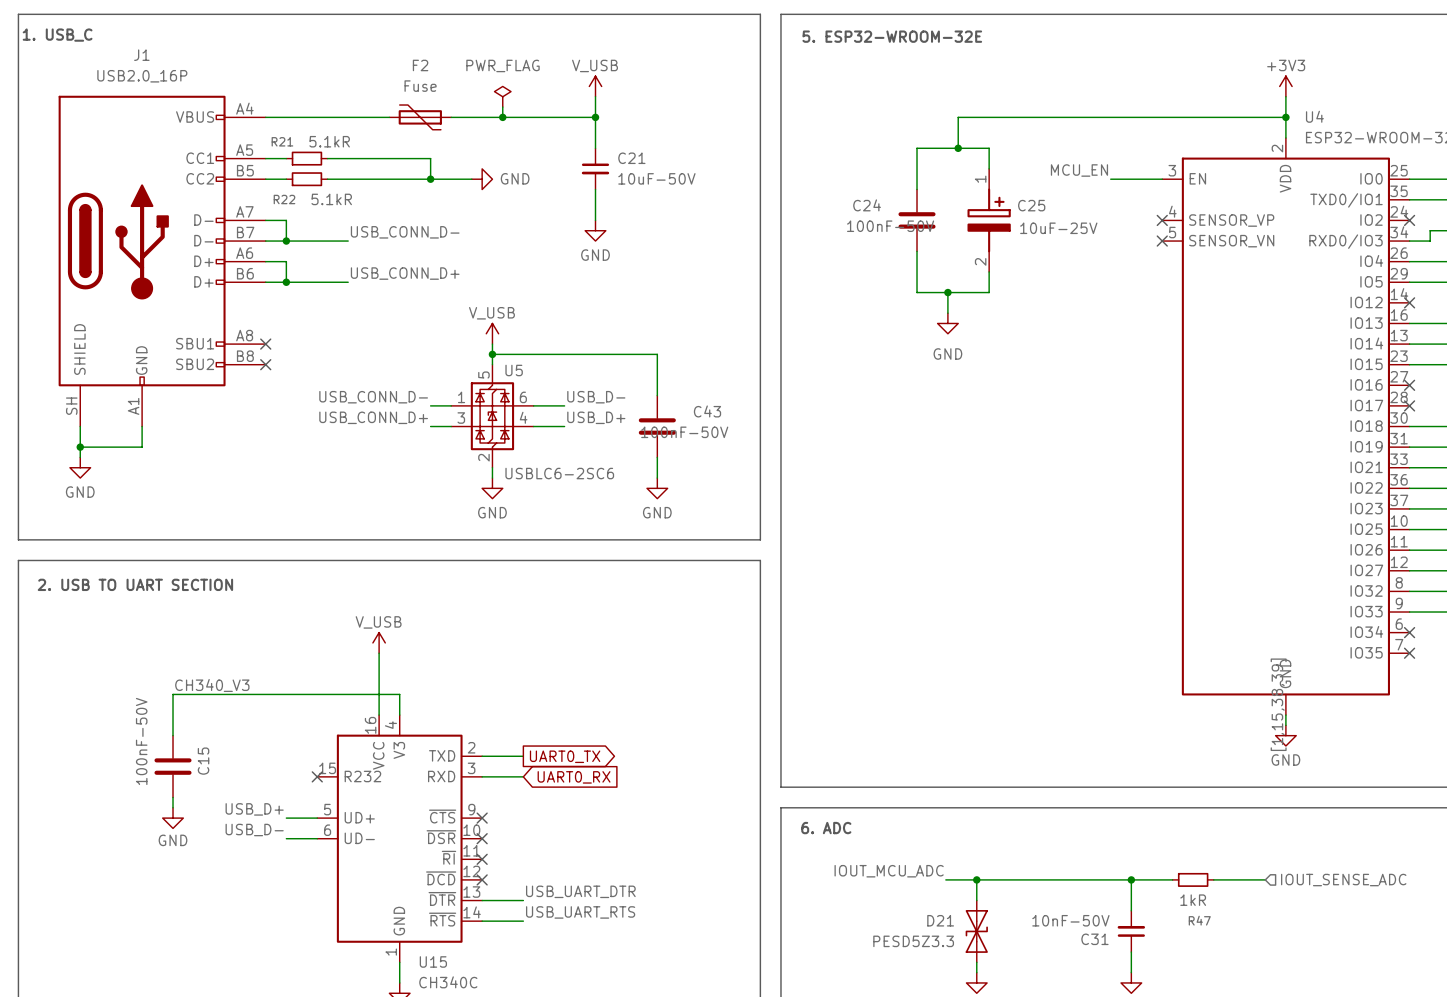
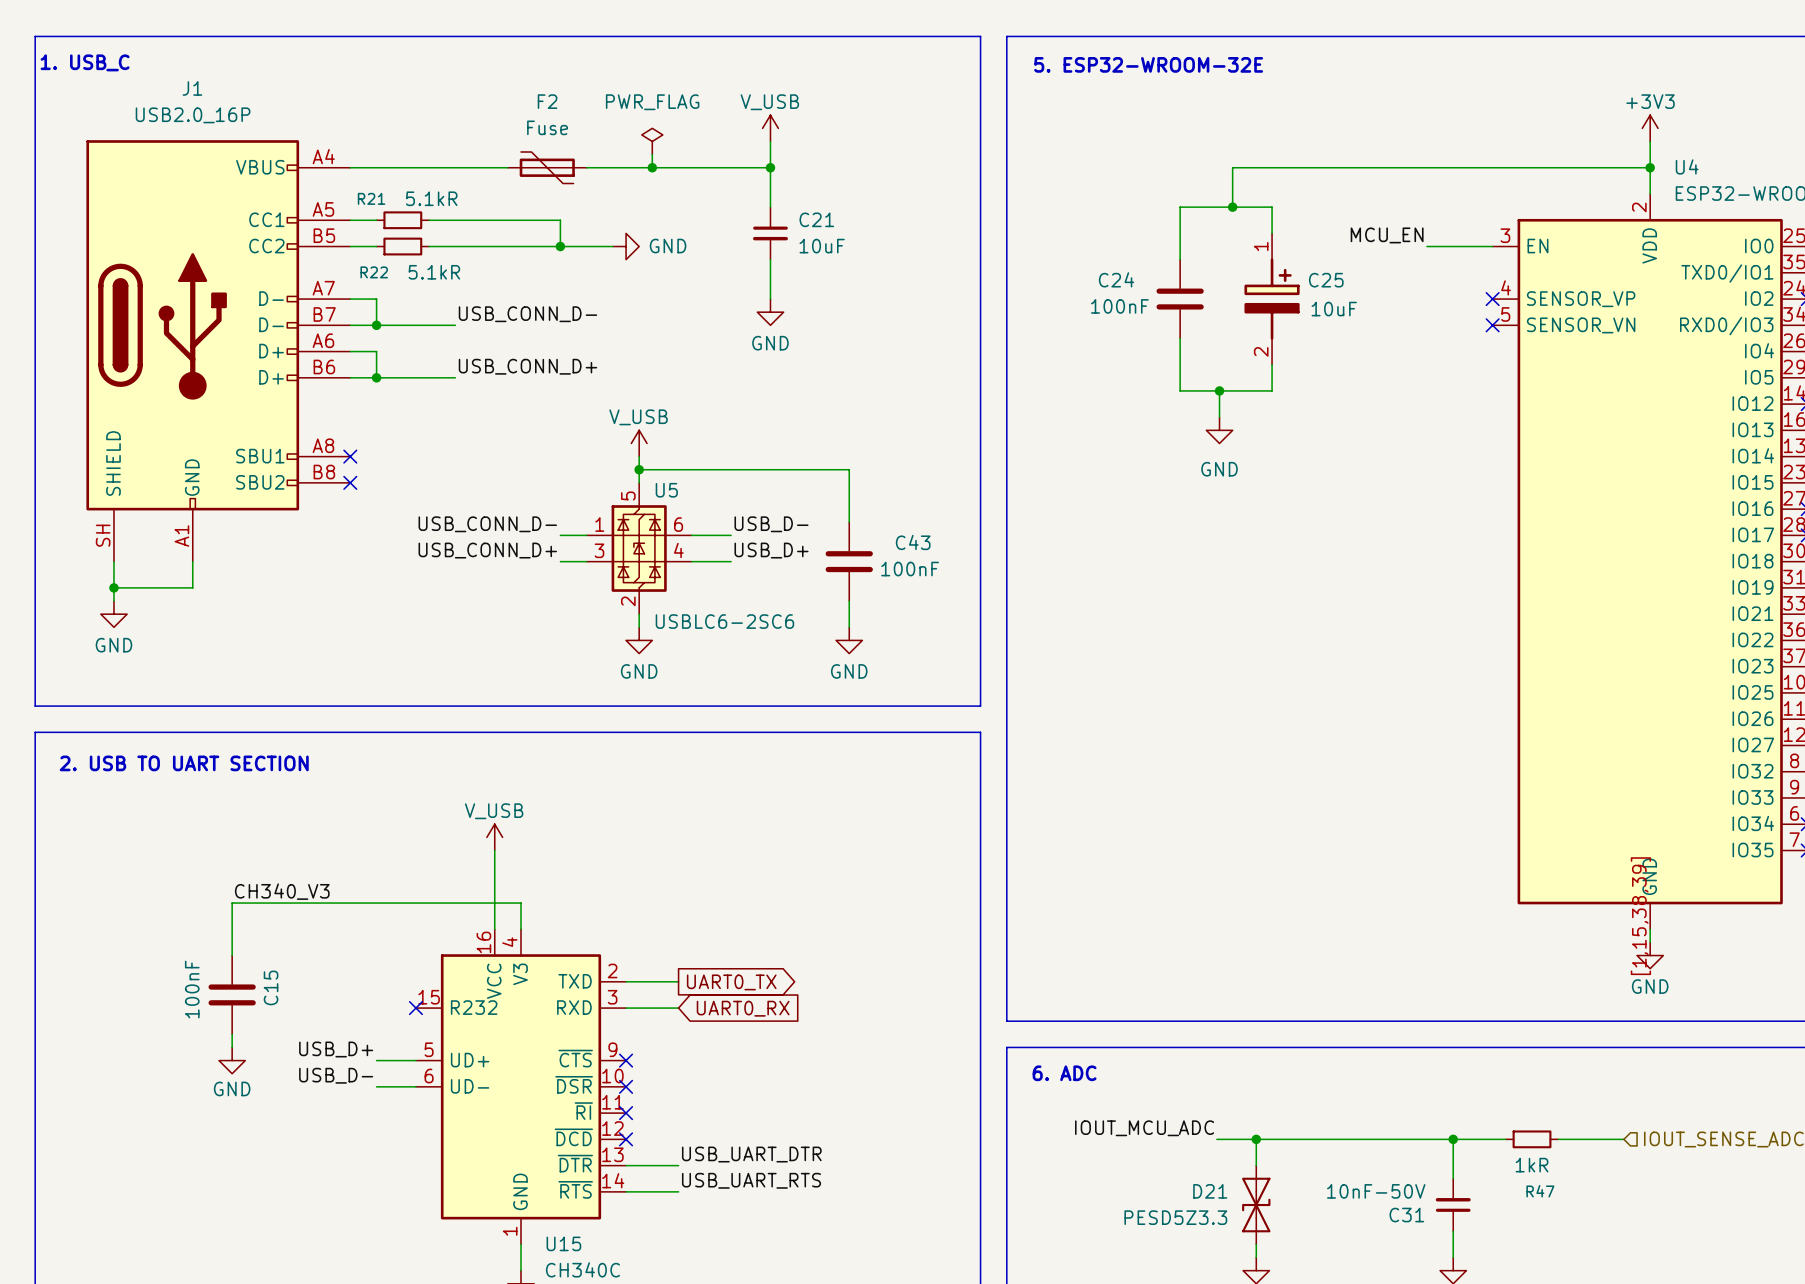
C21 value: 10uF-50V (656, 178) -> 10uF (822, 246)
C24 value: 100nF-50V (890, 226) -> 100nF (1119, 306)
C25 value: 10uF-25V (1058, 228) -> 10uF (1334, 309)
C43 value: 100nF-50V (684, 432) -> 100nF (910, 569)
C15 value: 100nF-50V (141, 741) -> 100nF (192, 989)

